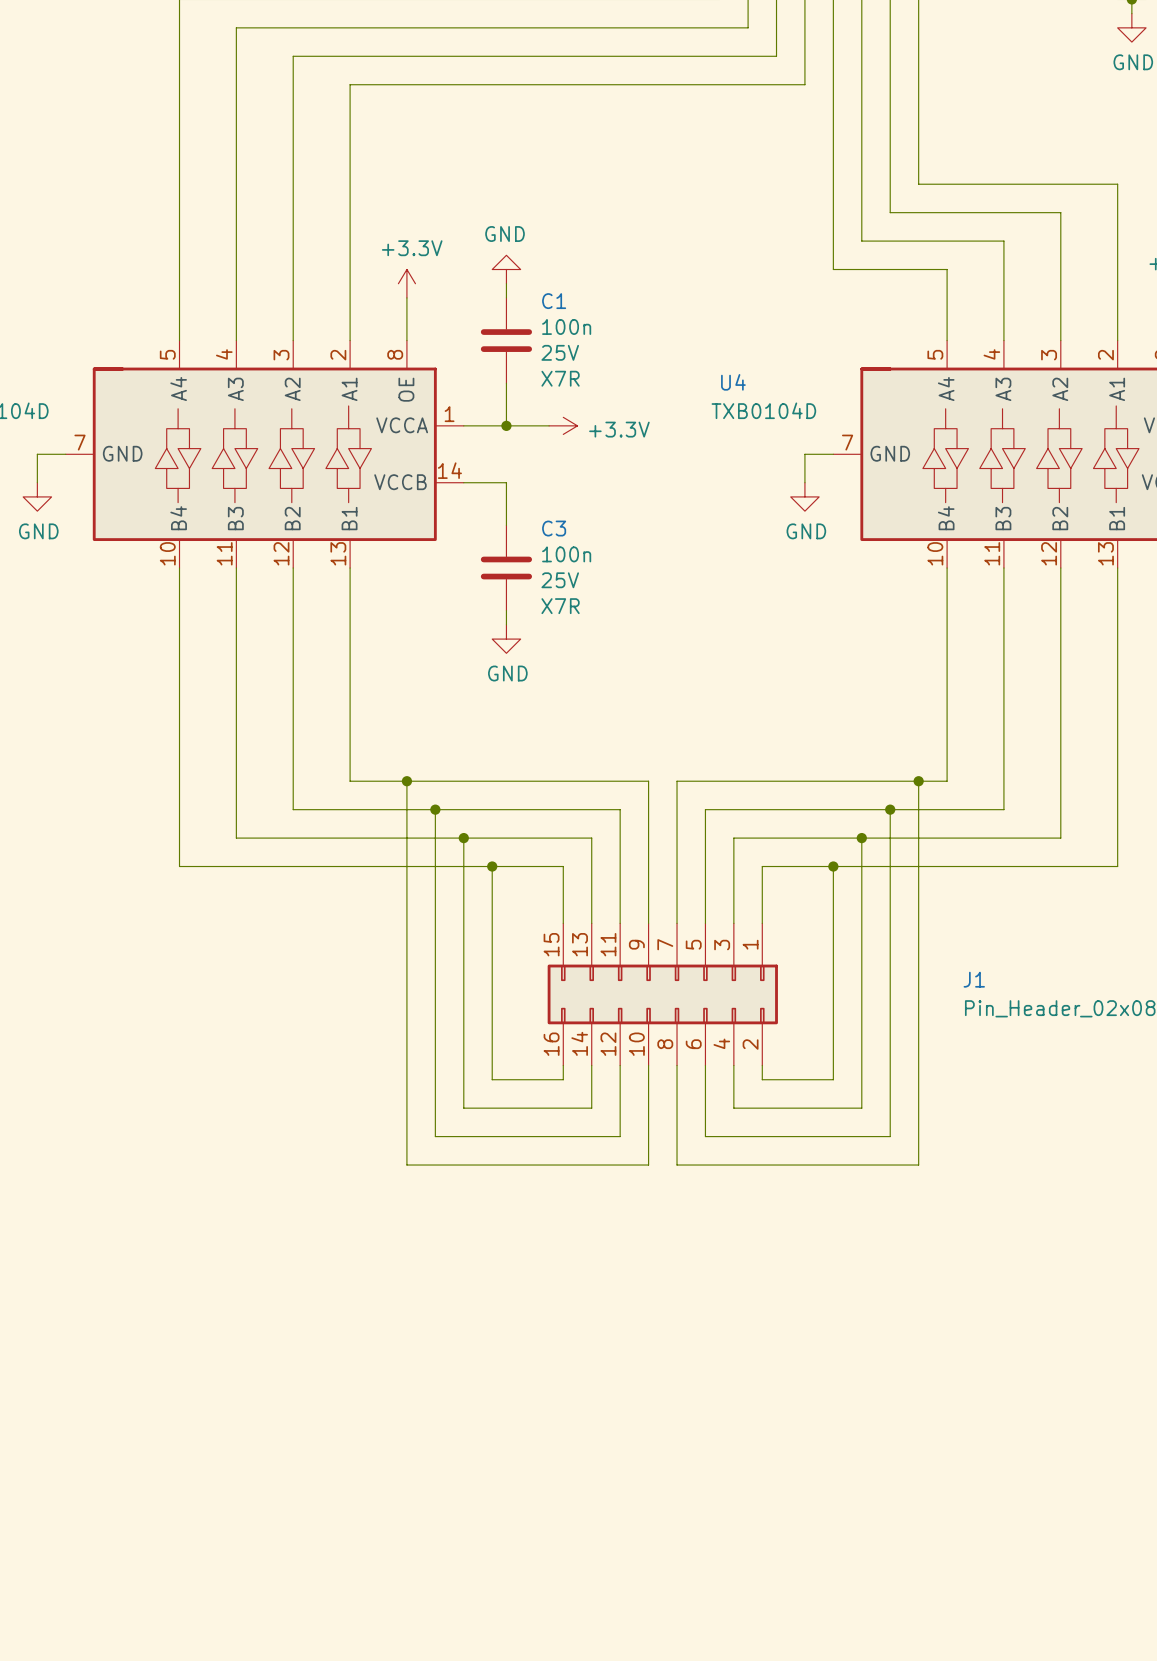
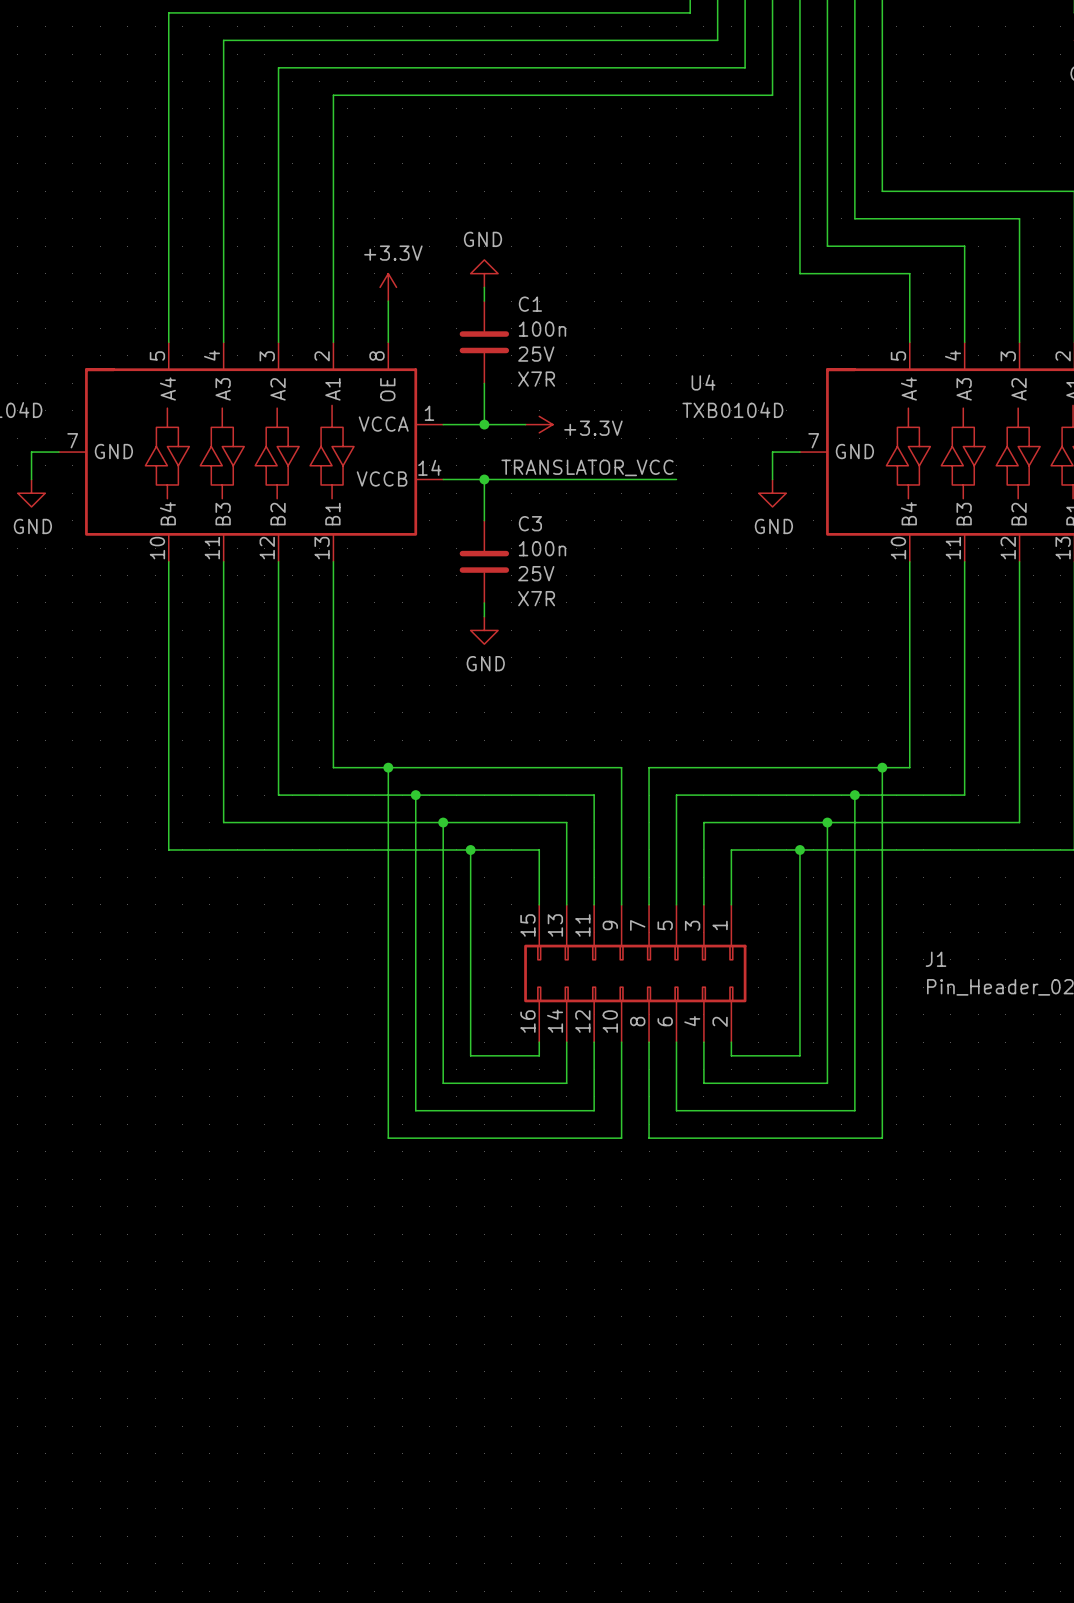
label: none -> TRANSLATOR_VCC (587, 467)
wire: none -> (484, 479) (676, 479)
junction: none -> (484, 479)

